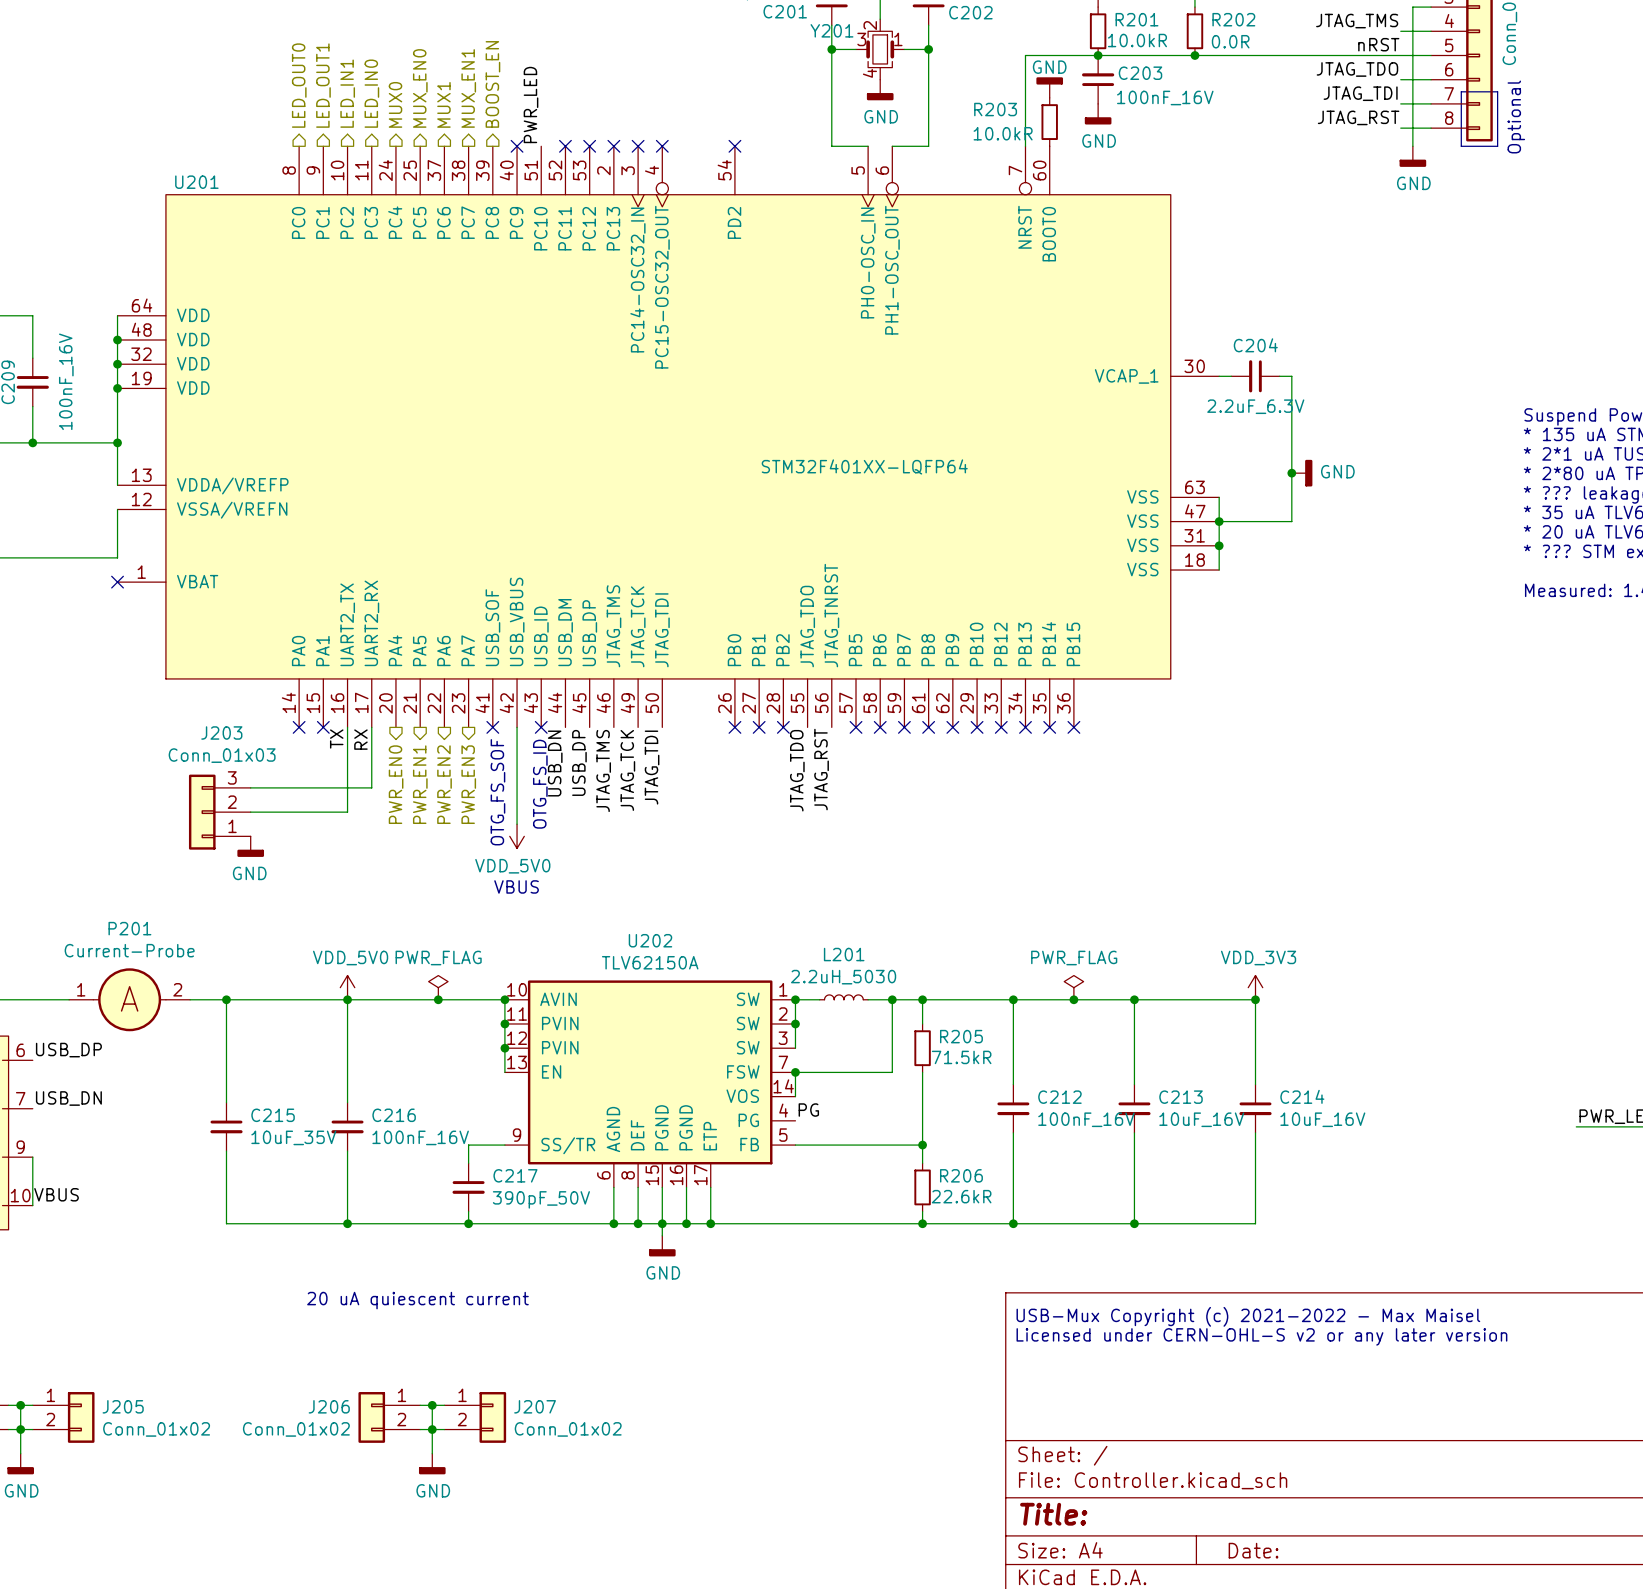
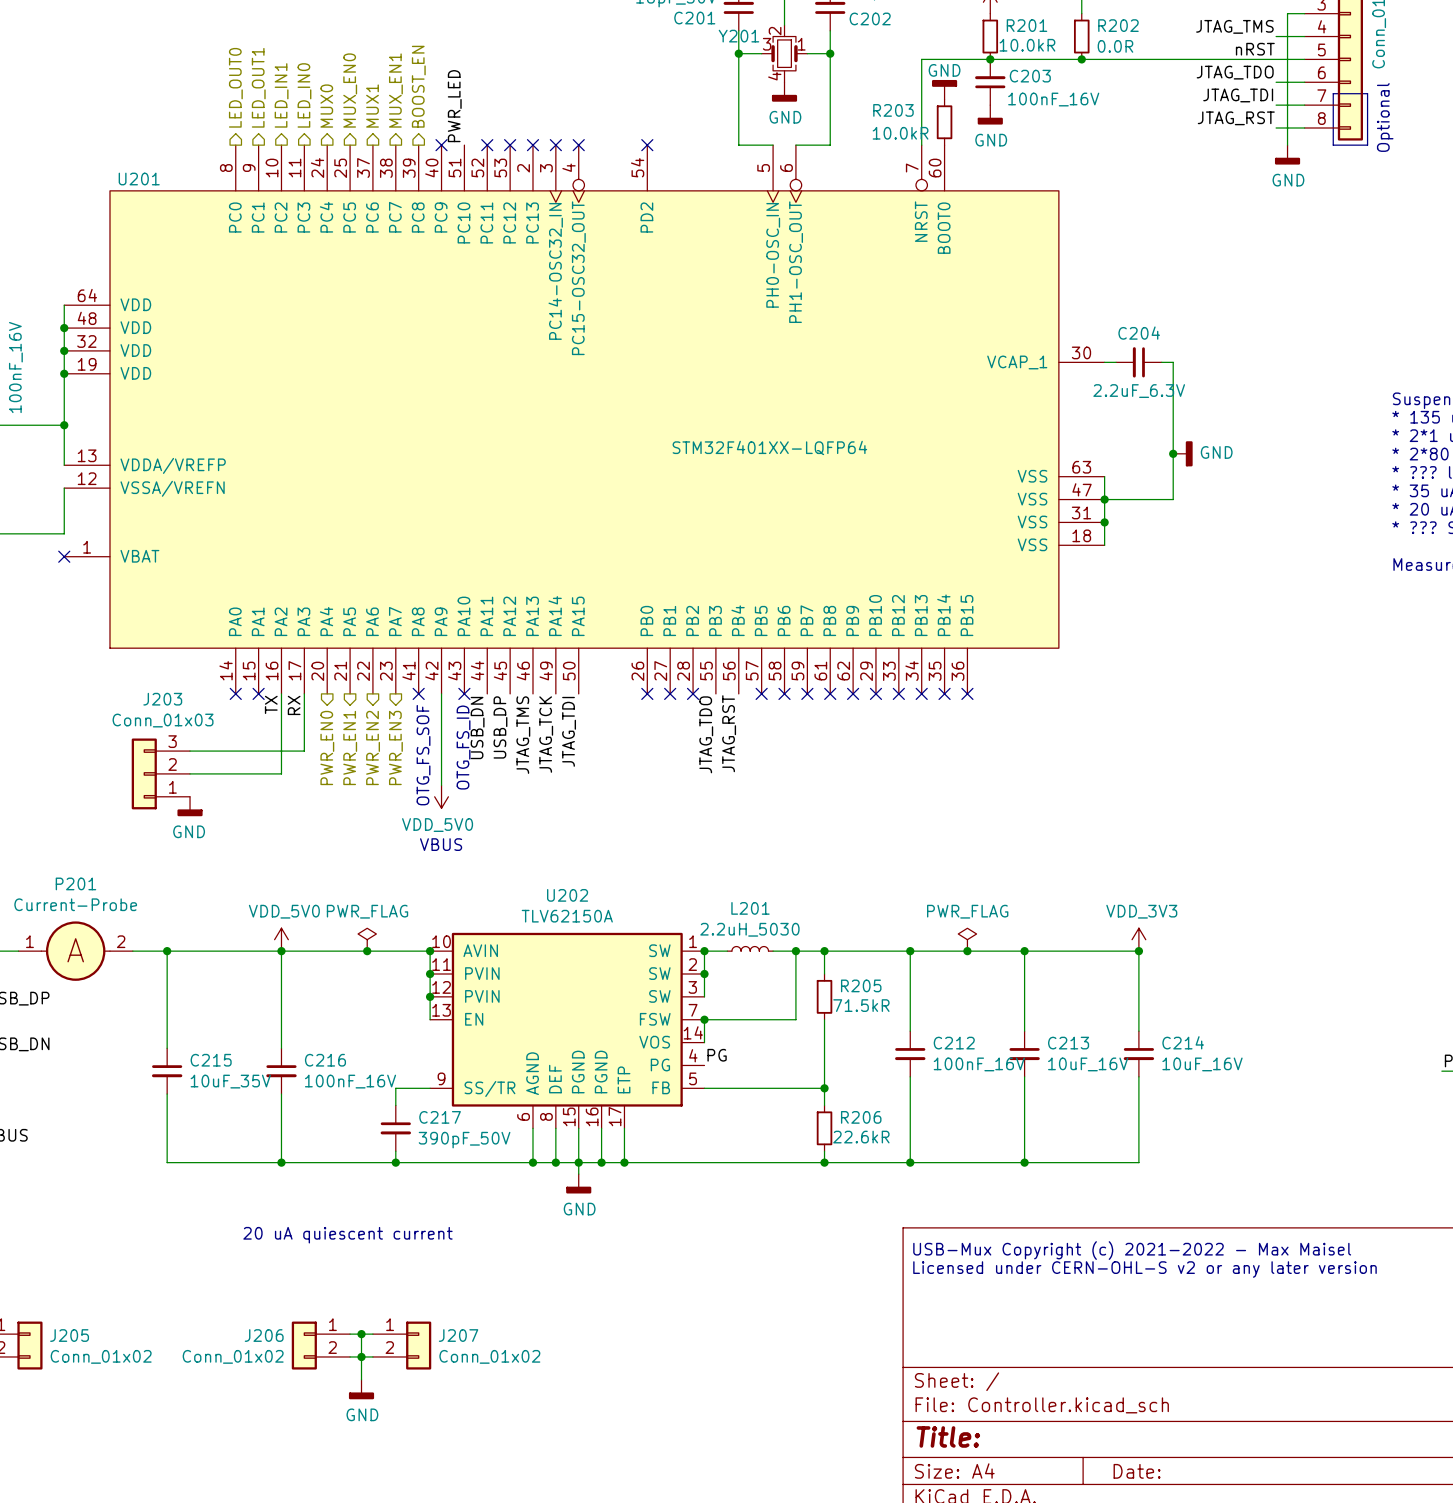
U201 symbol: [117, 146, 1220, 728] -> [64, 145, 1105, 694]

